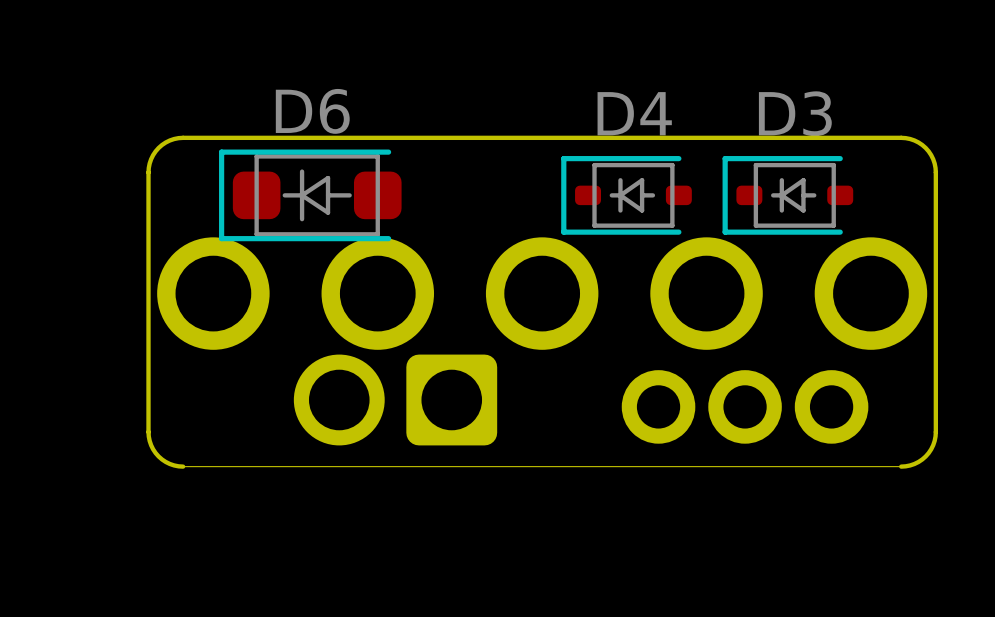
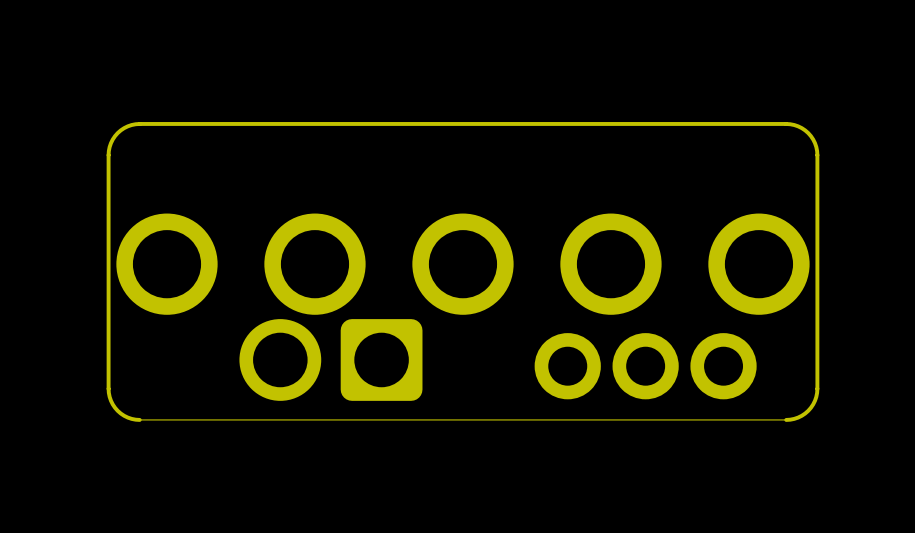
D6: (310, 195) -> none
D4: (626, 195) -> none
D3: (787, 195) -> none

